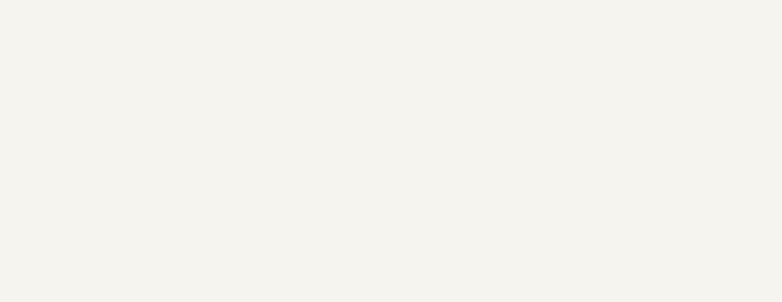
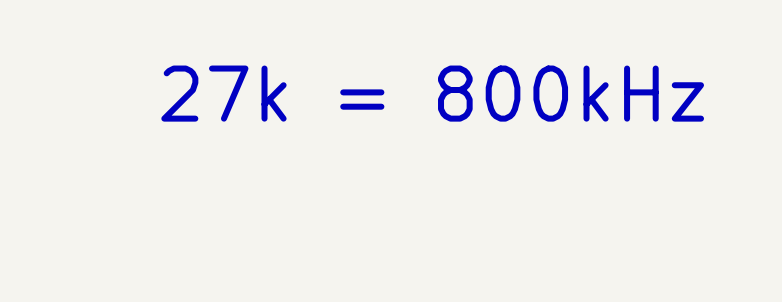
text: none -> 27k = 800kHz (432, 93)

